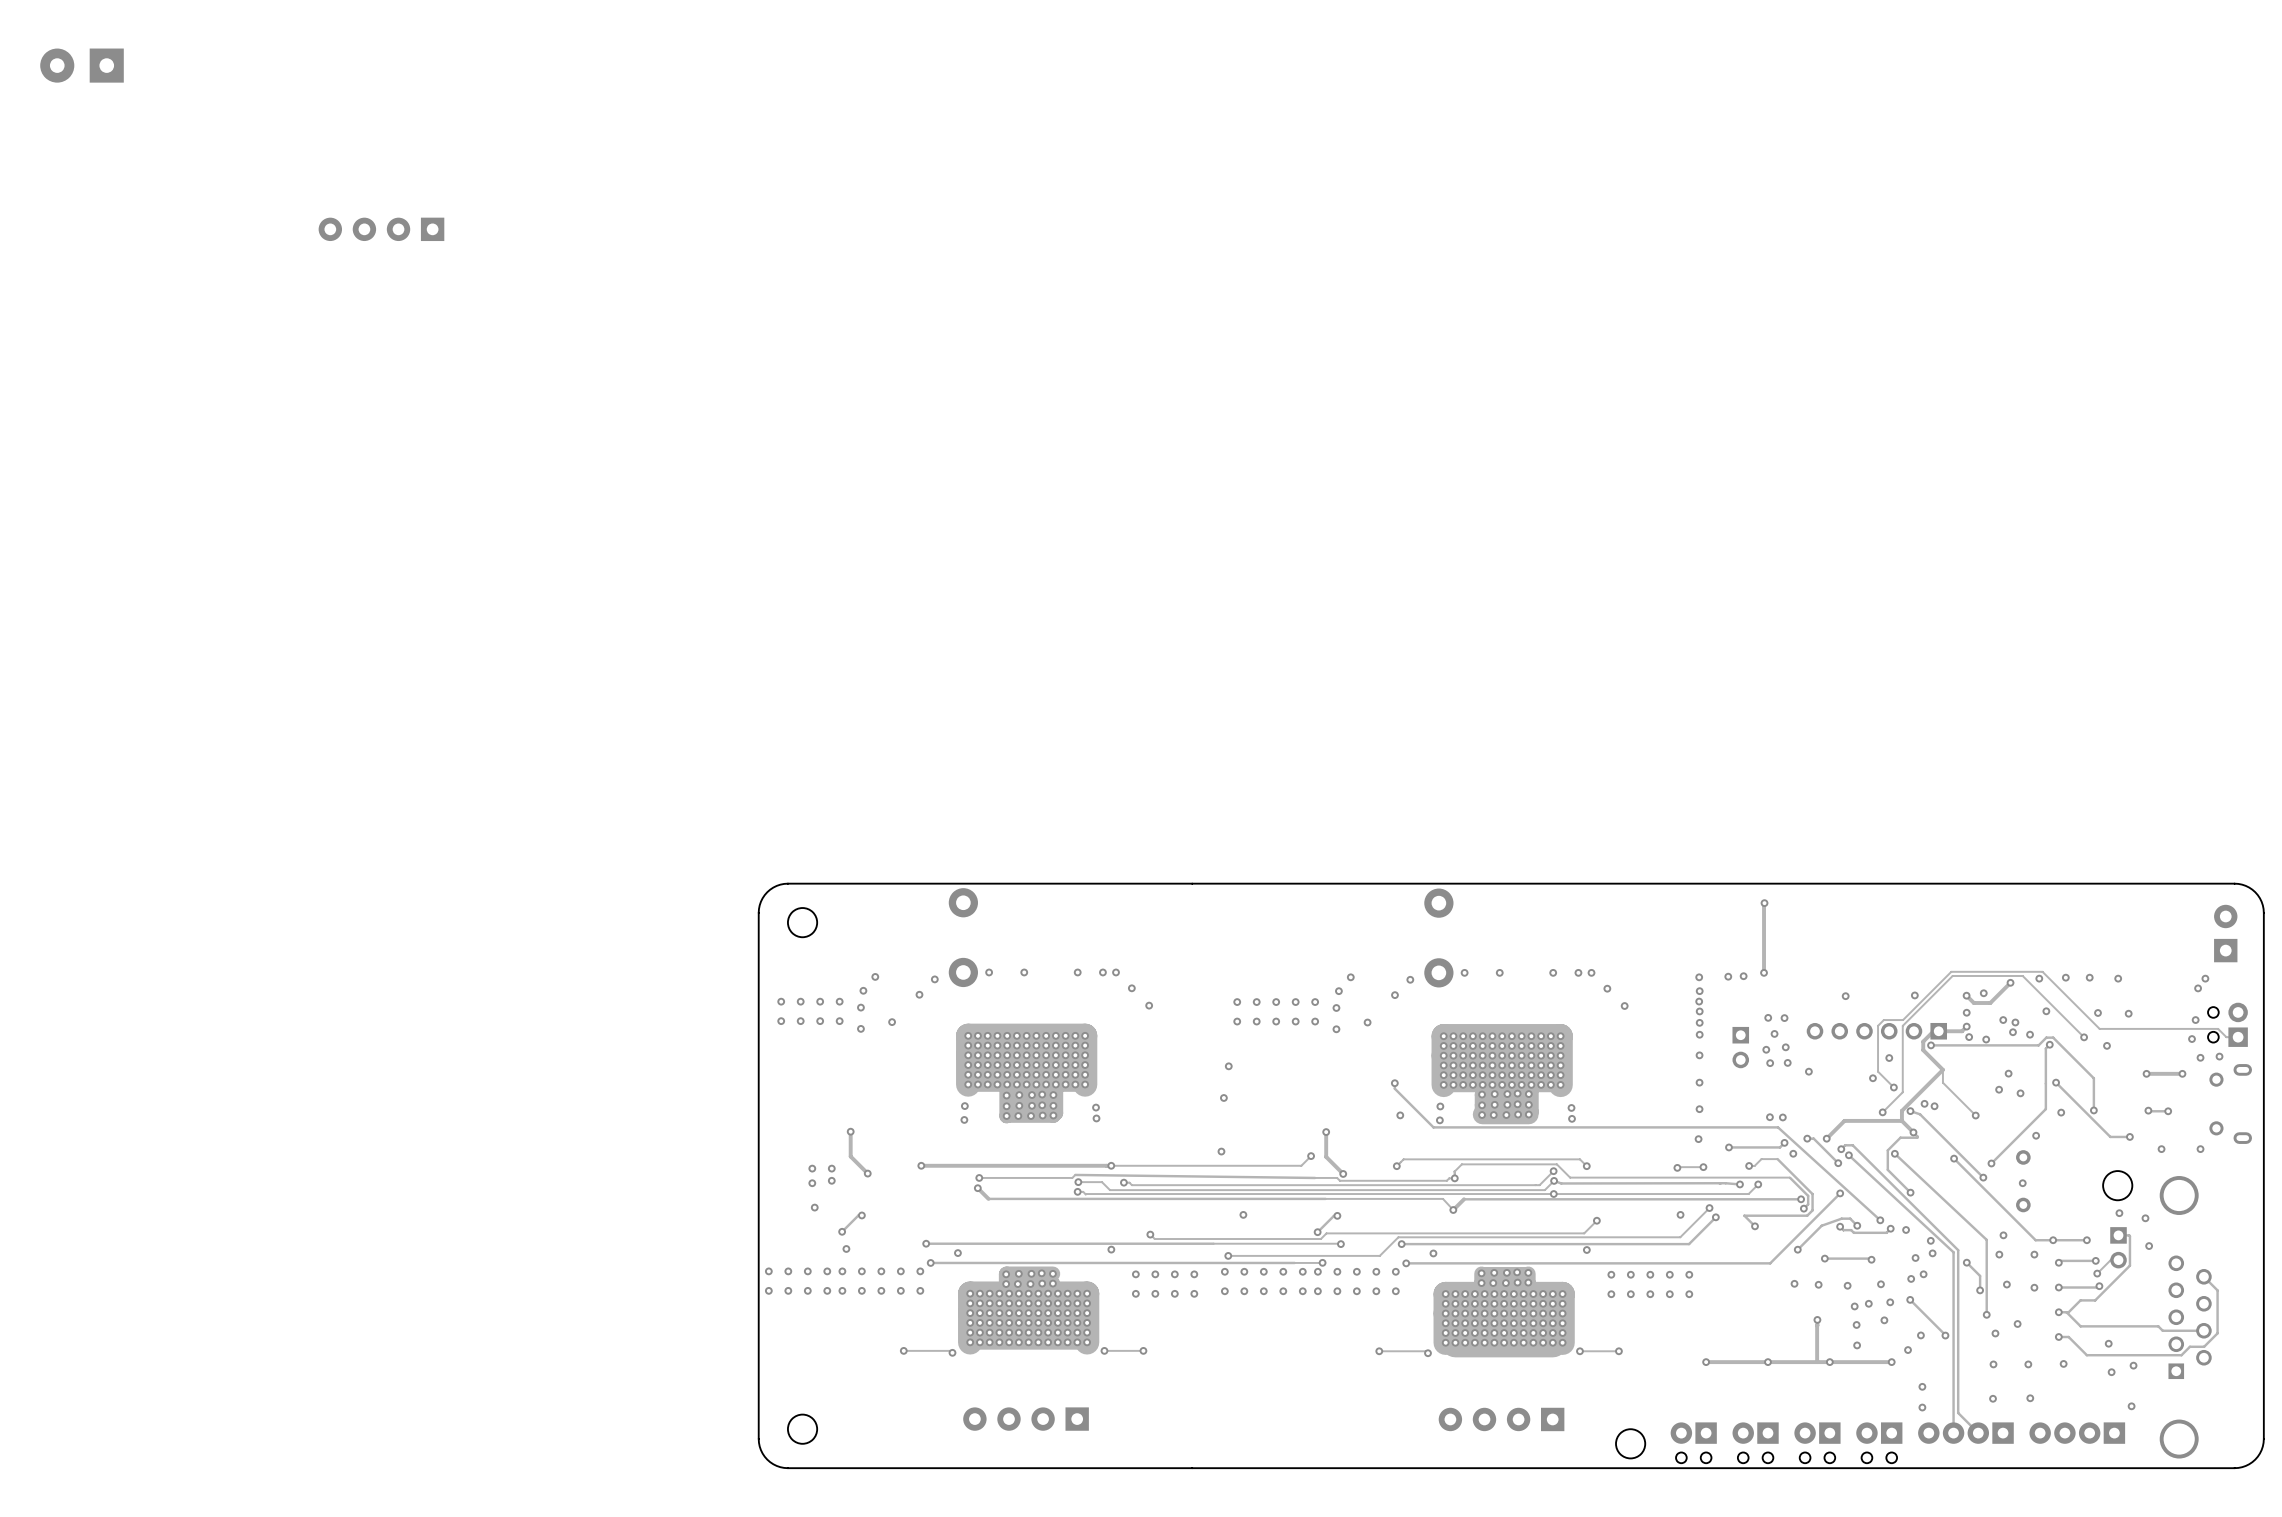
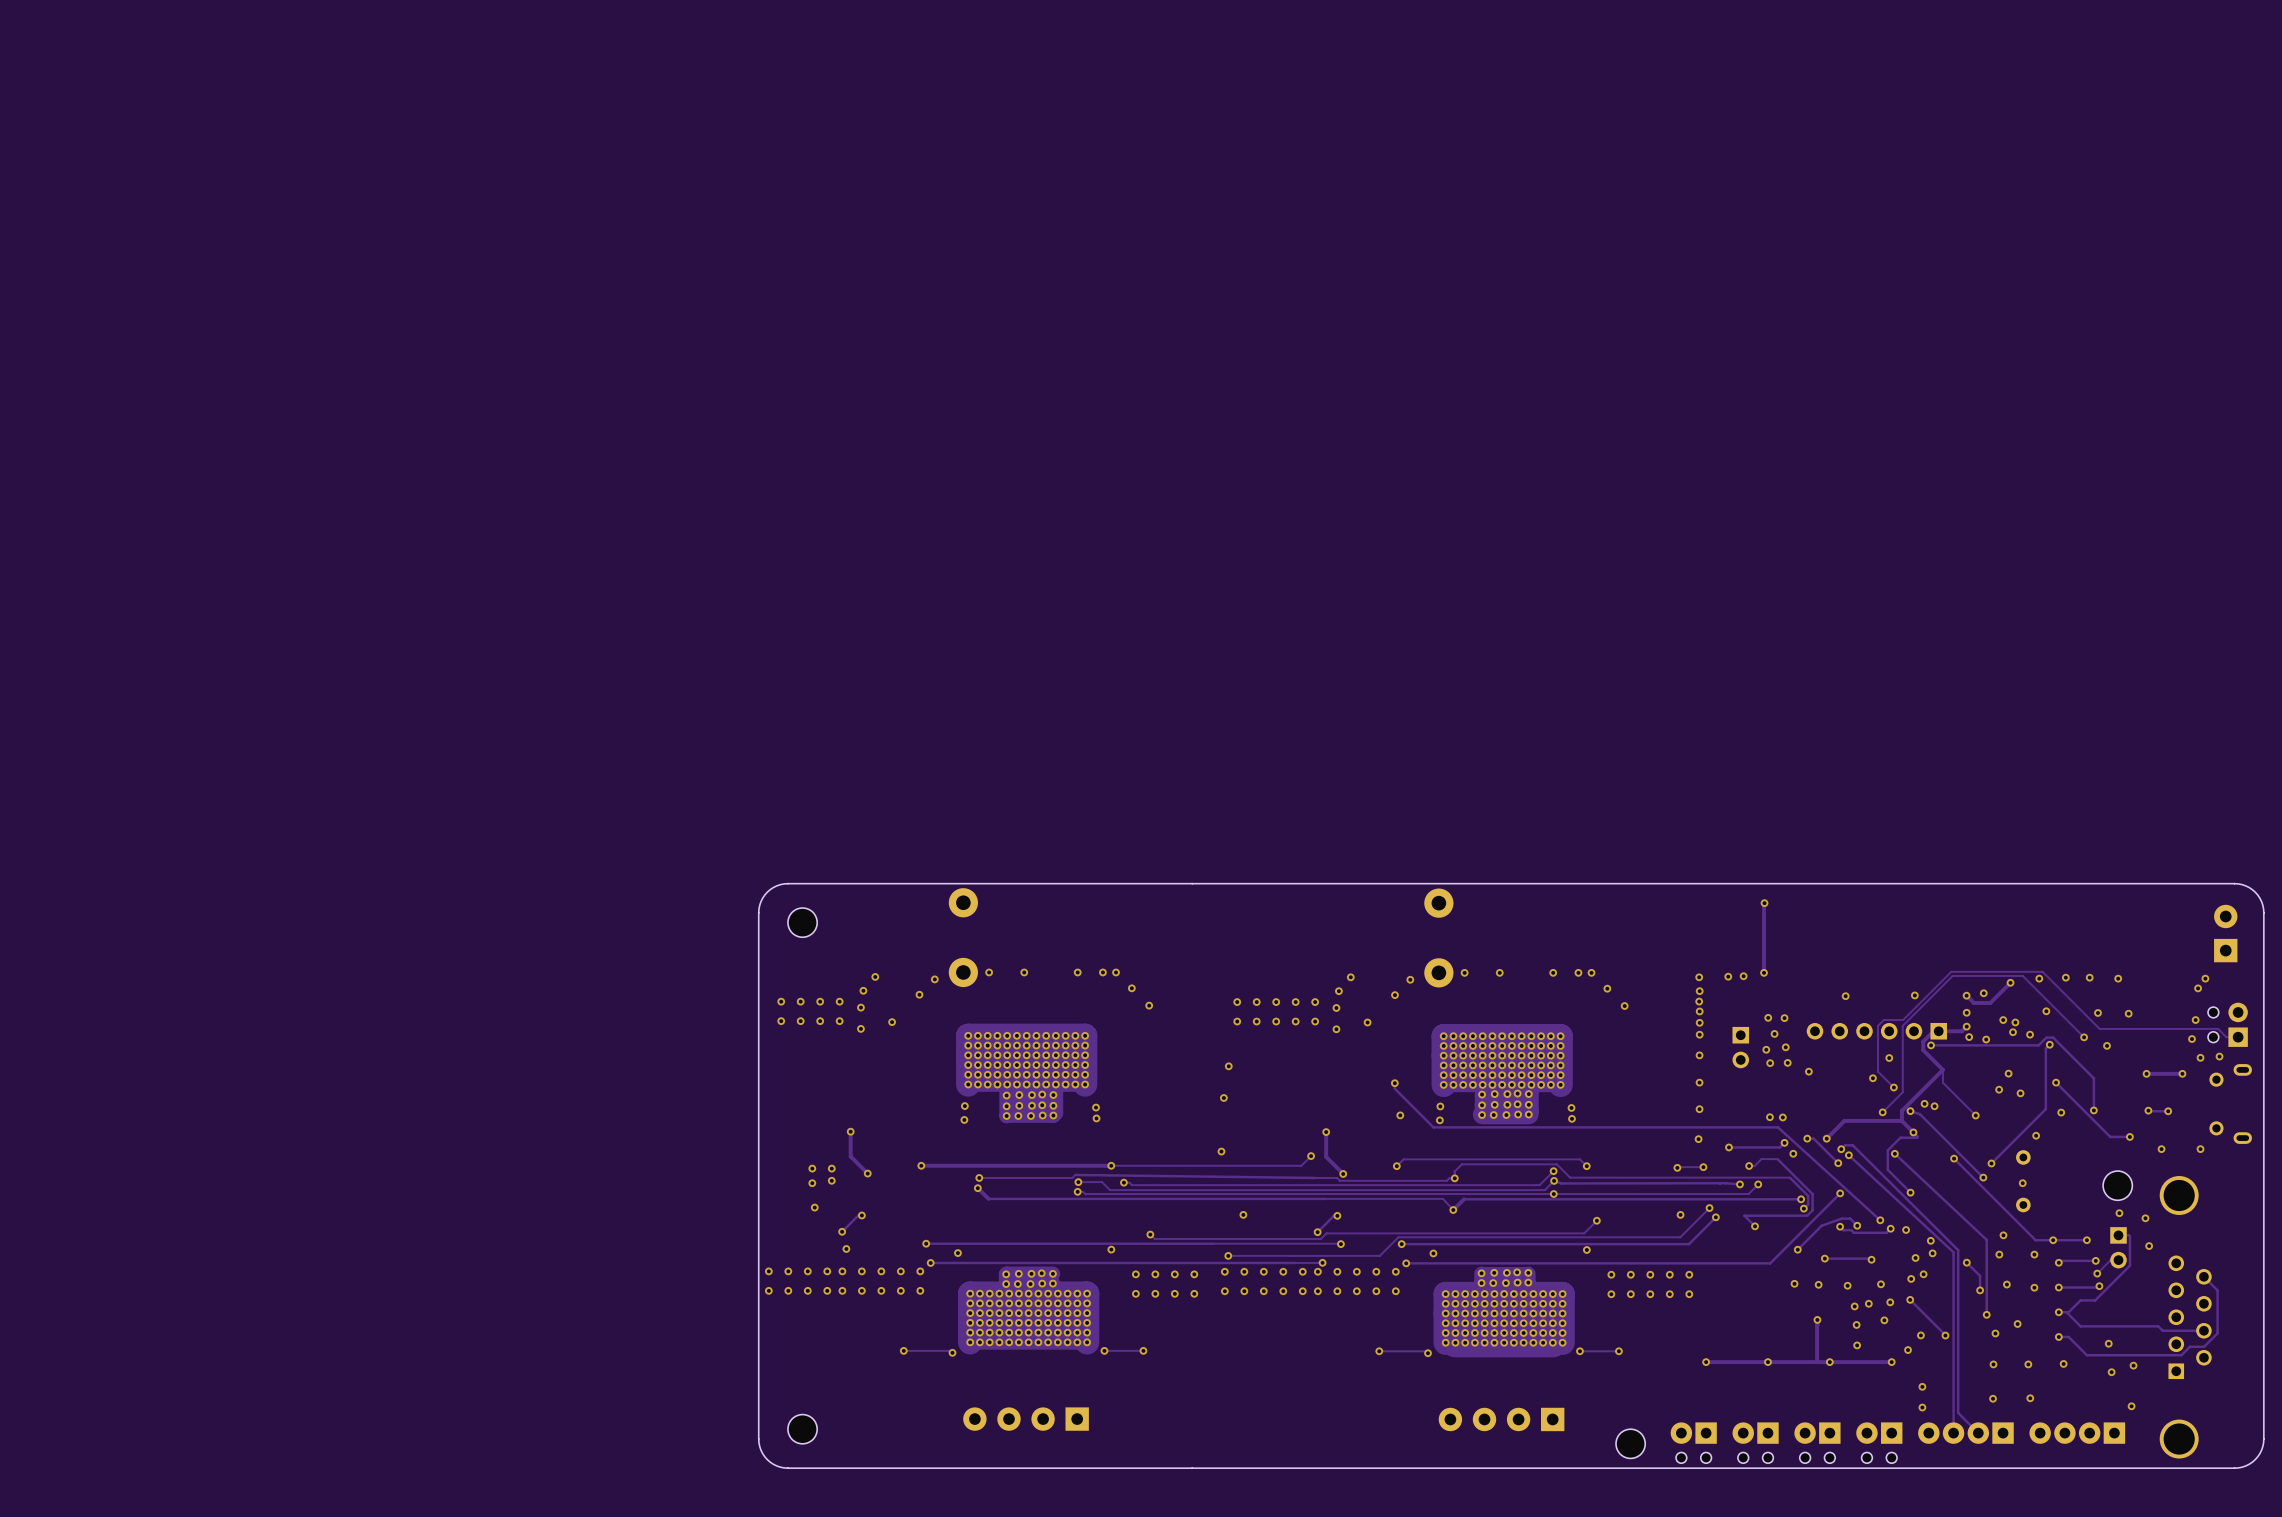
part: (82, 65) -> none
part: (381, 229) -> none

